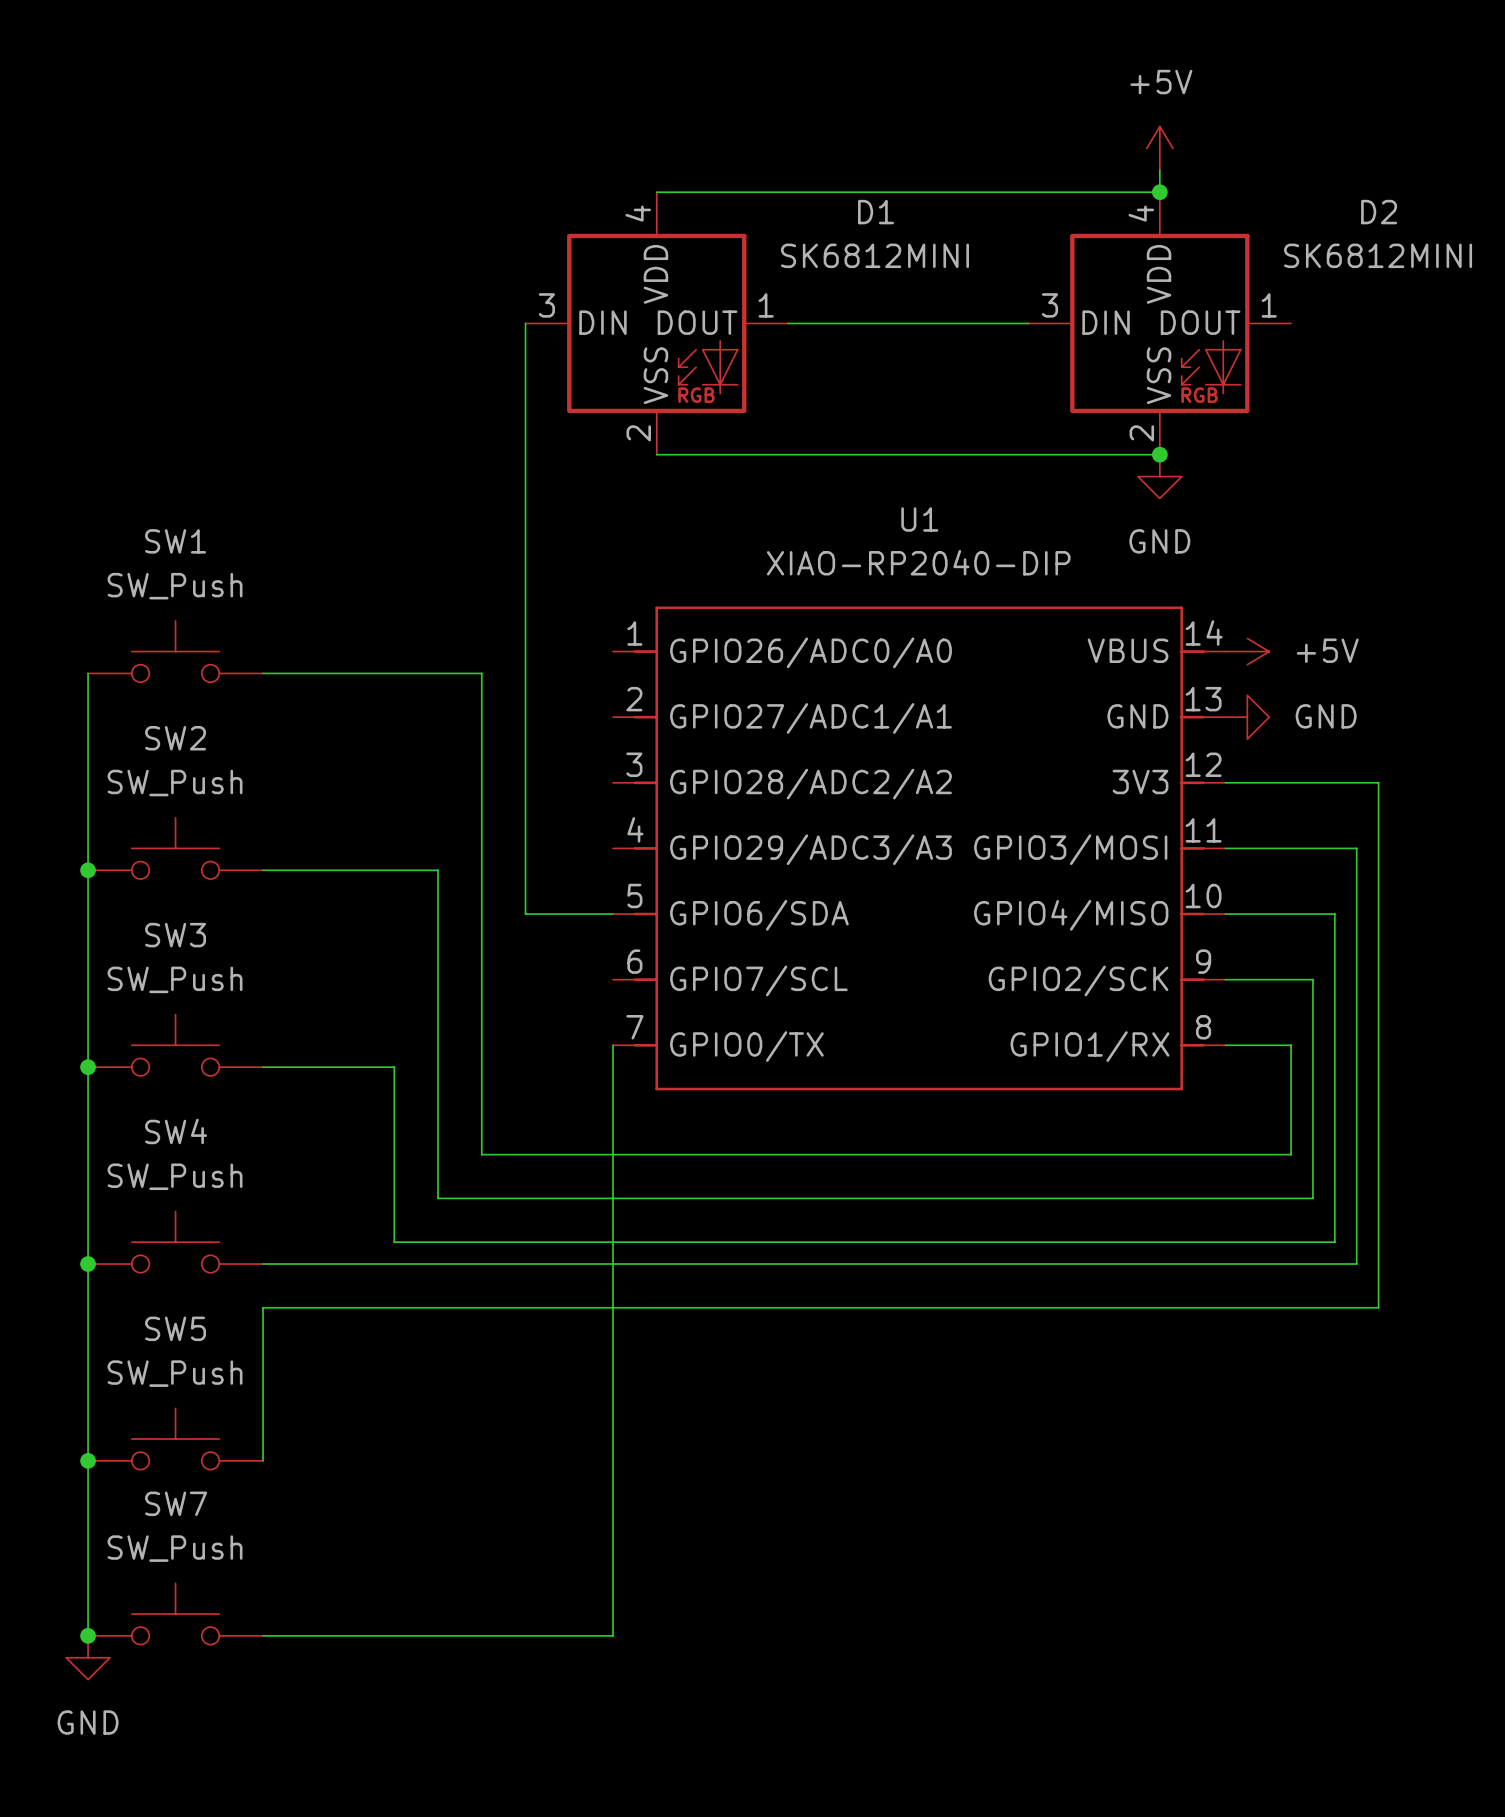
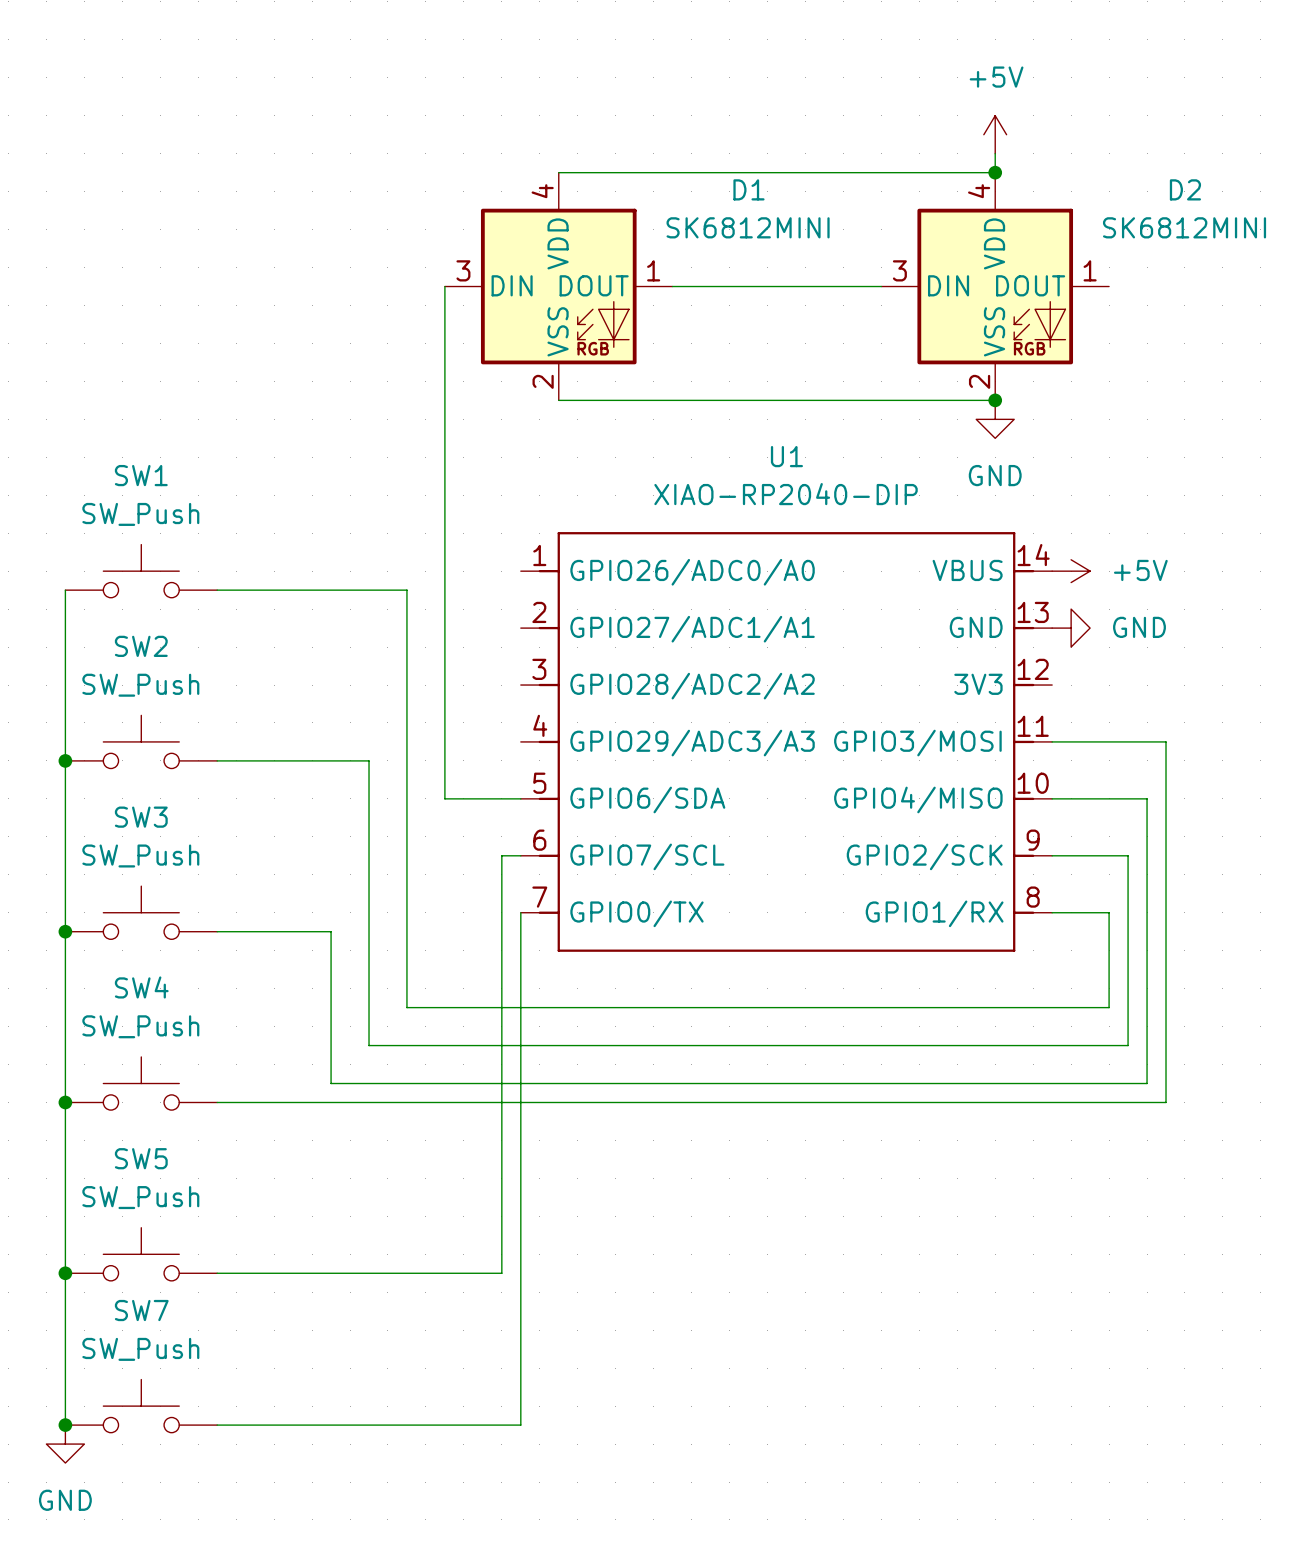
wire: (1225, 782) (1378, 782) (1378, 1307) (263, 1307) (263, 1460) -> (520, 855) (501, 855) (501, 1273) (217, 1273)

